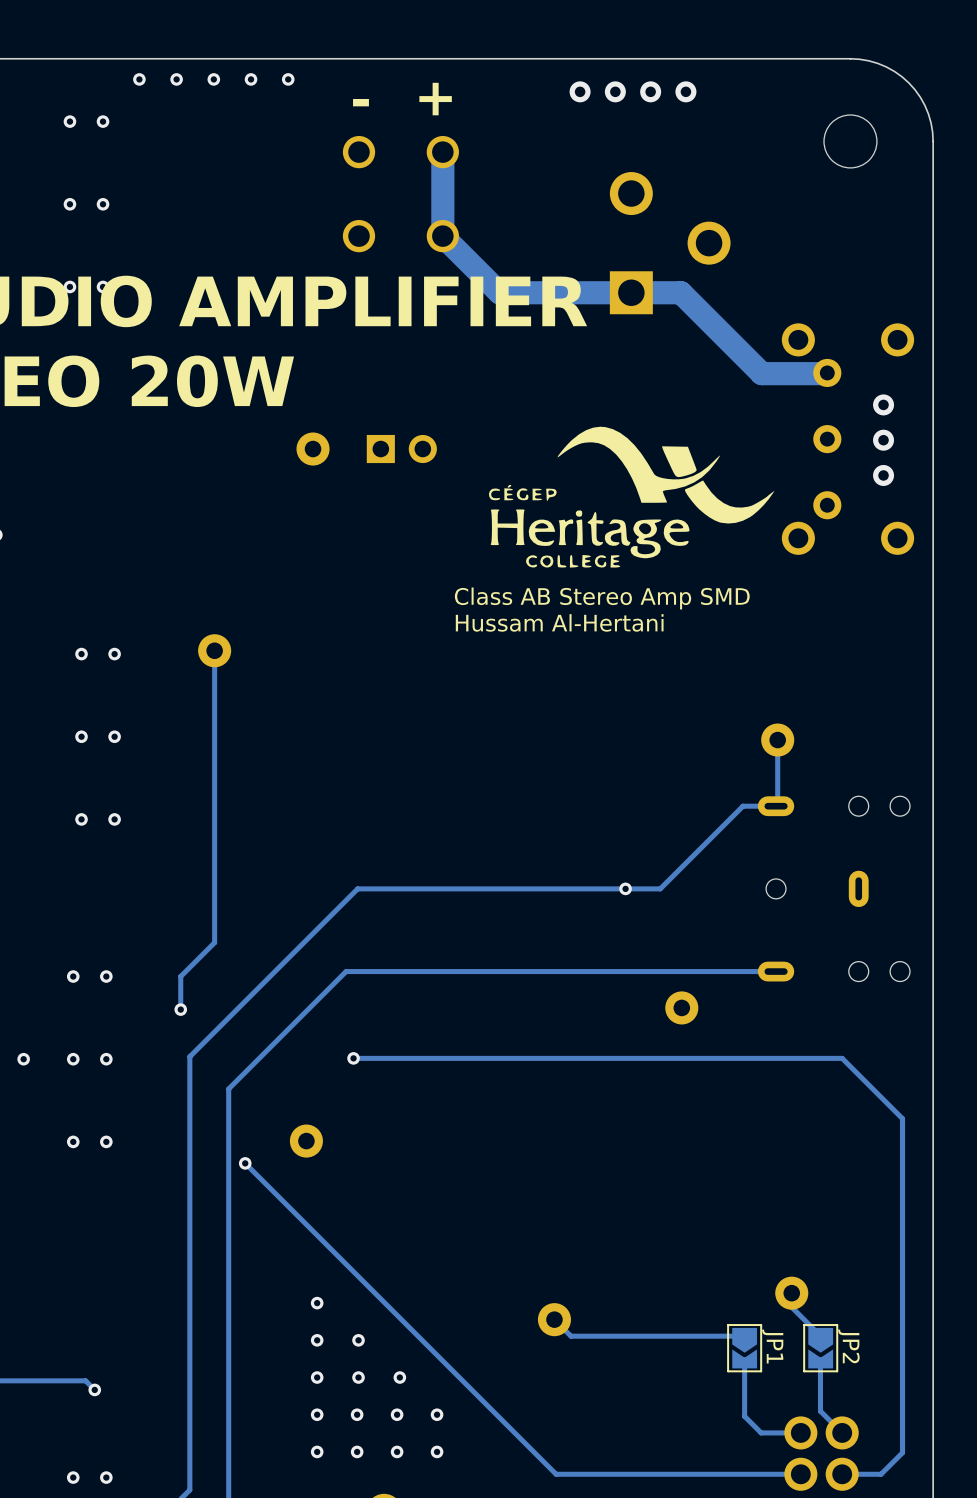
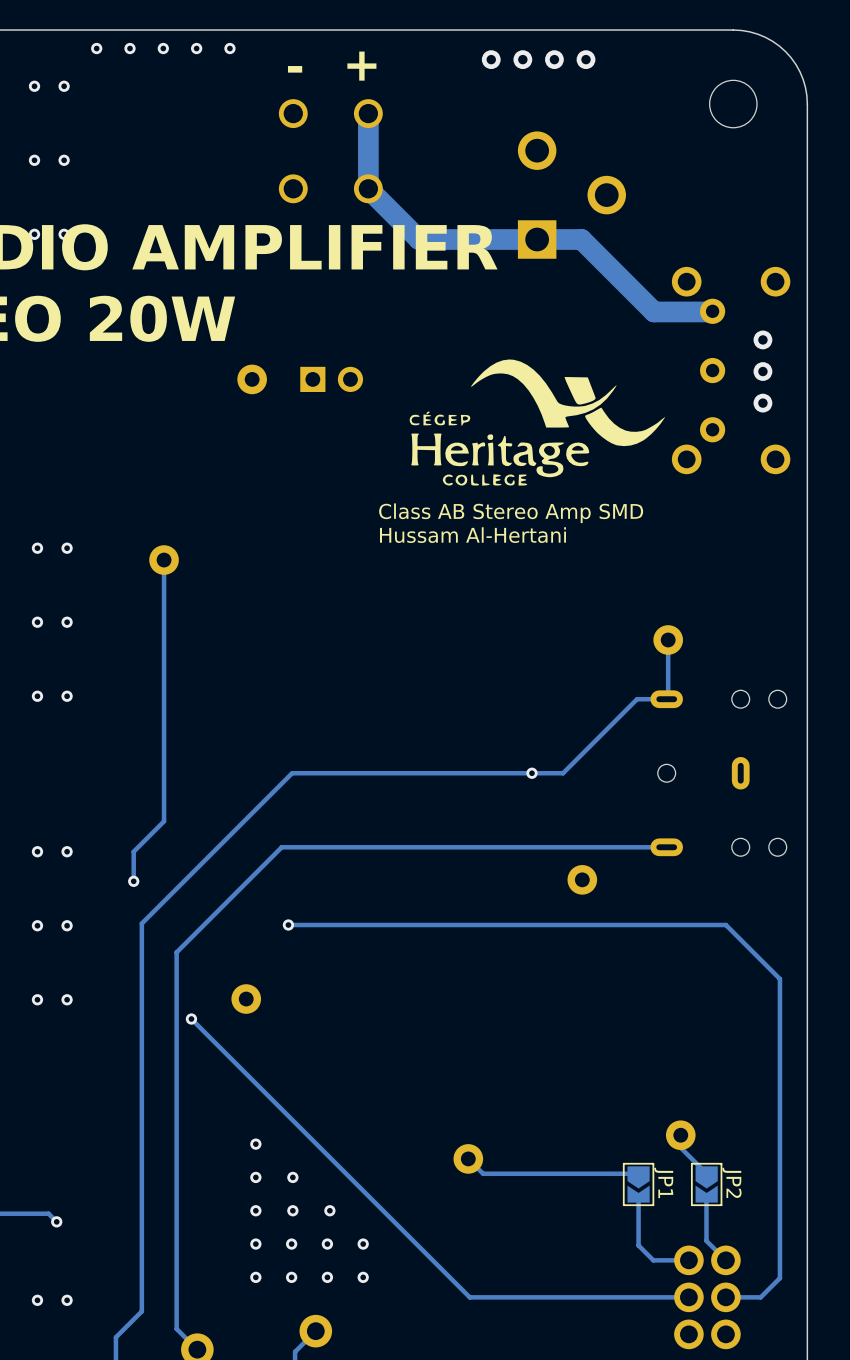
via: none -> (37, 548)
via: none -> (67, 548)
via: (81, 654) -> none
via: (114, 654) -> none
via: none -> (37, 622)
via: none -> (67, 622)
via: (81, 736) -> none
via: (114, 736) -> none
via: none -> (37, 696)
via: none -> (67, 696)
via: (81, 819) -> none
via: (114, 819) -> none

